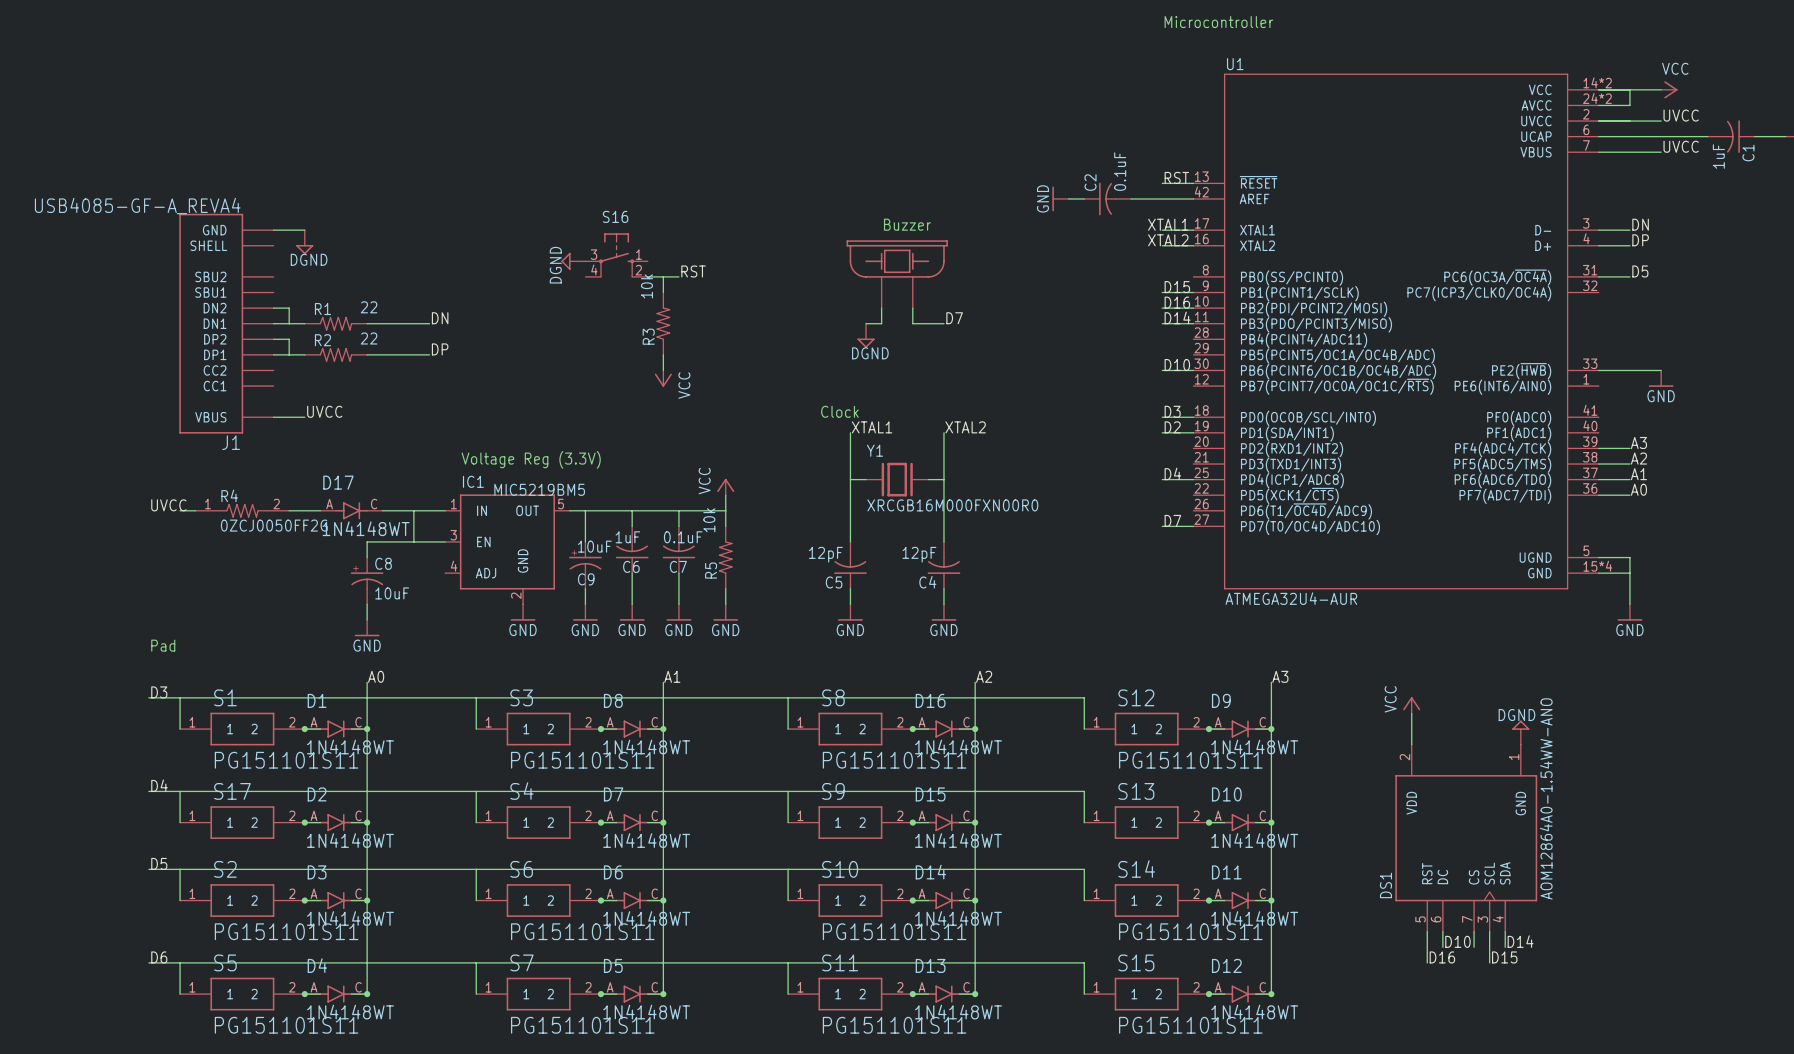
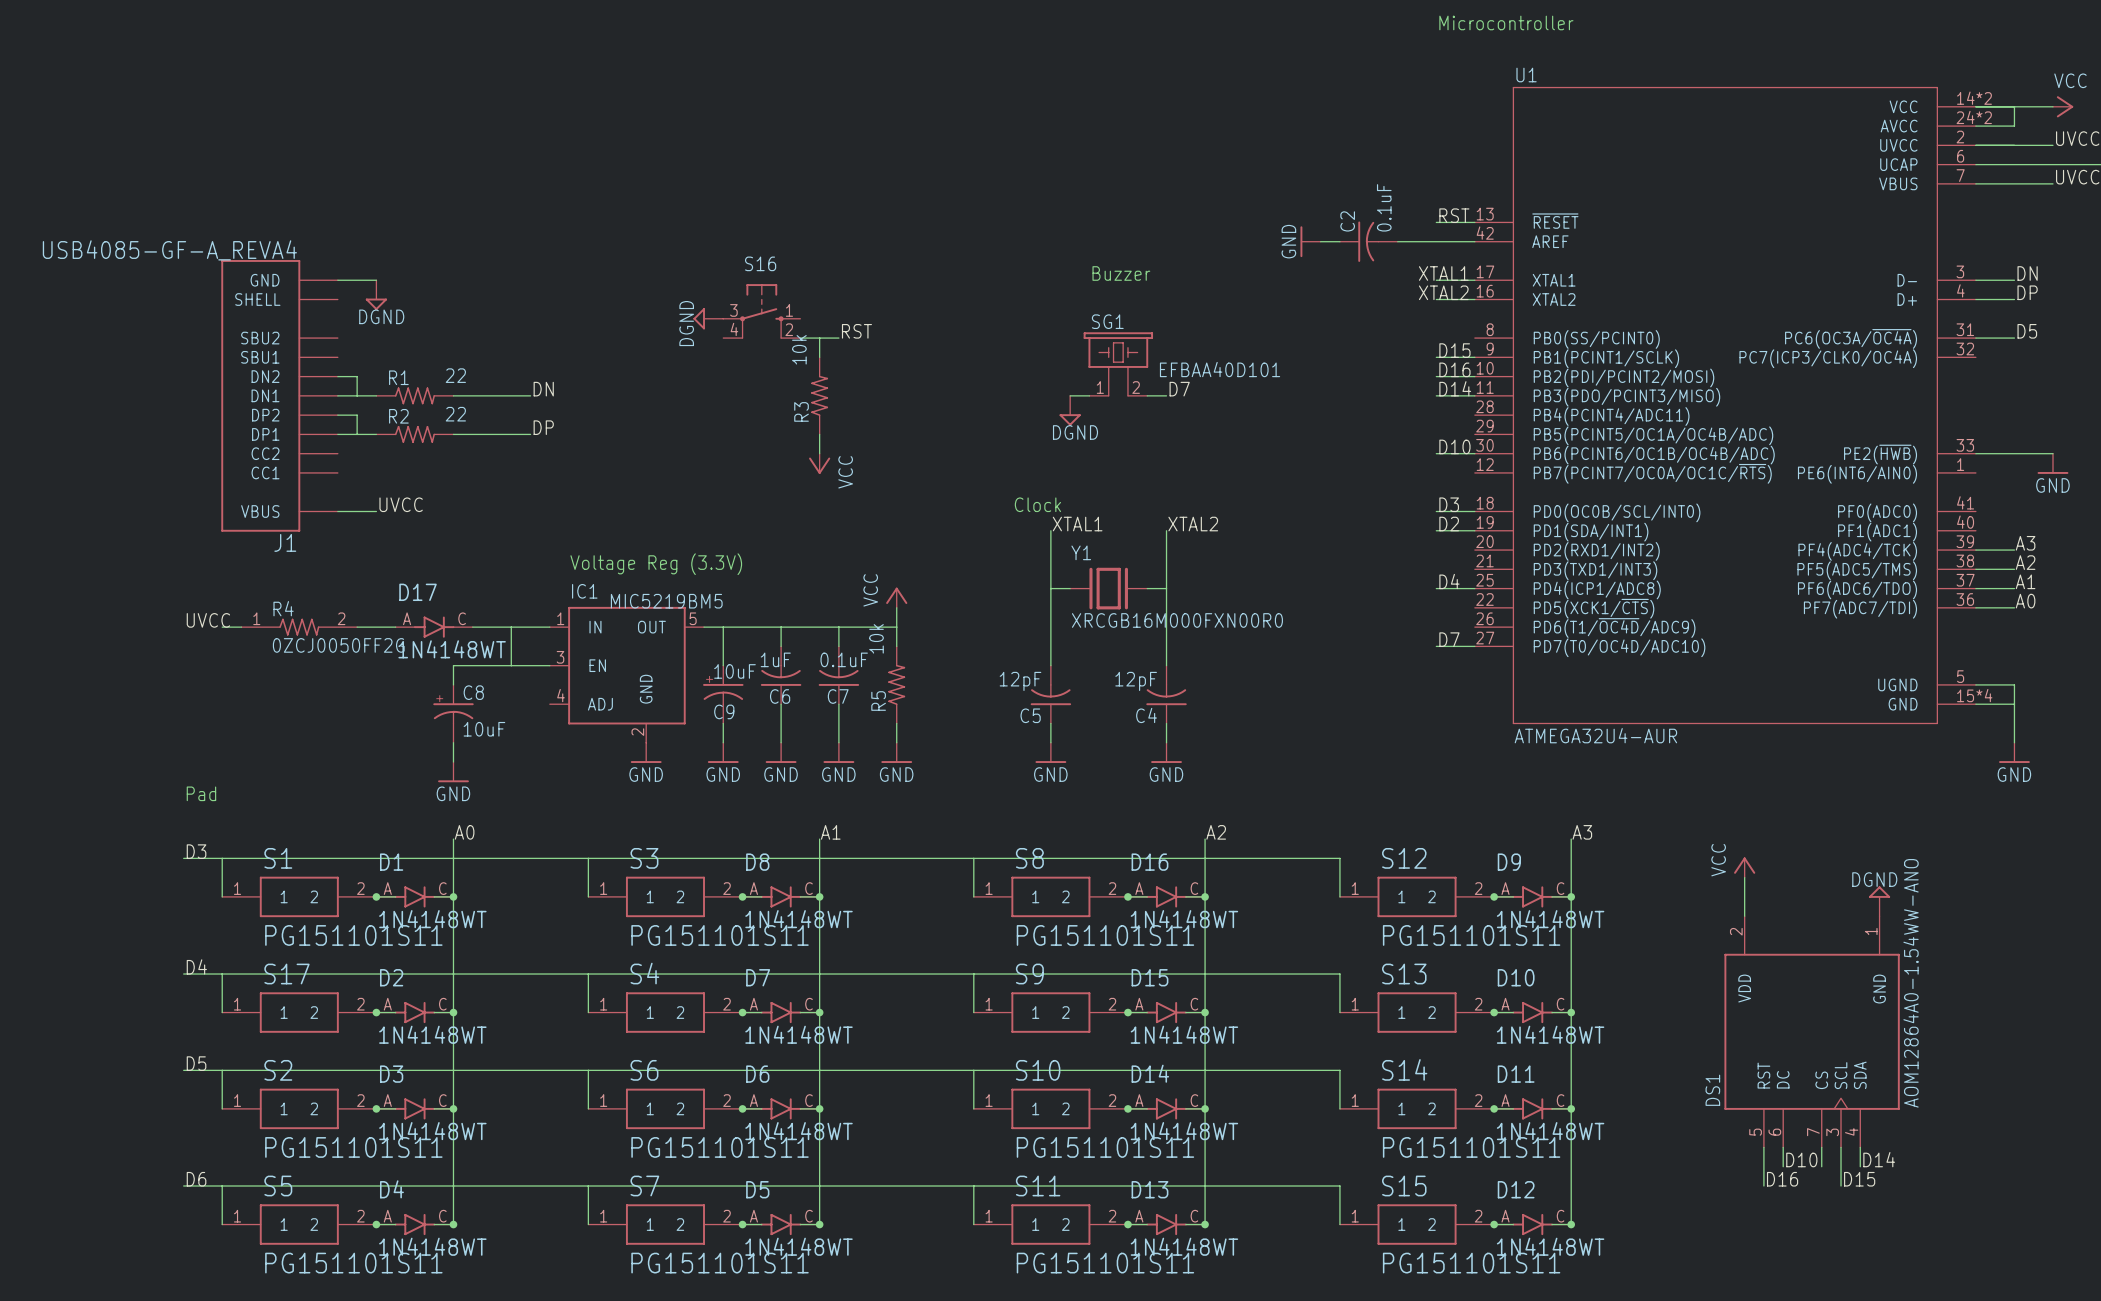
part: (897, 274) -> none
SG1: none -> EFBAA40D101 (1118, 364)
wire: (881, 308) (881, 323) -> none

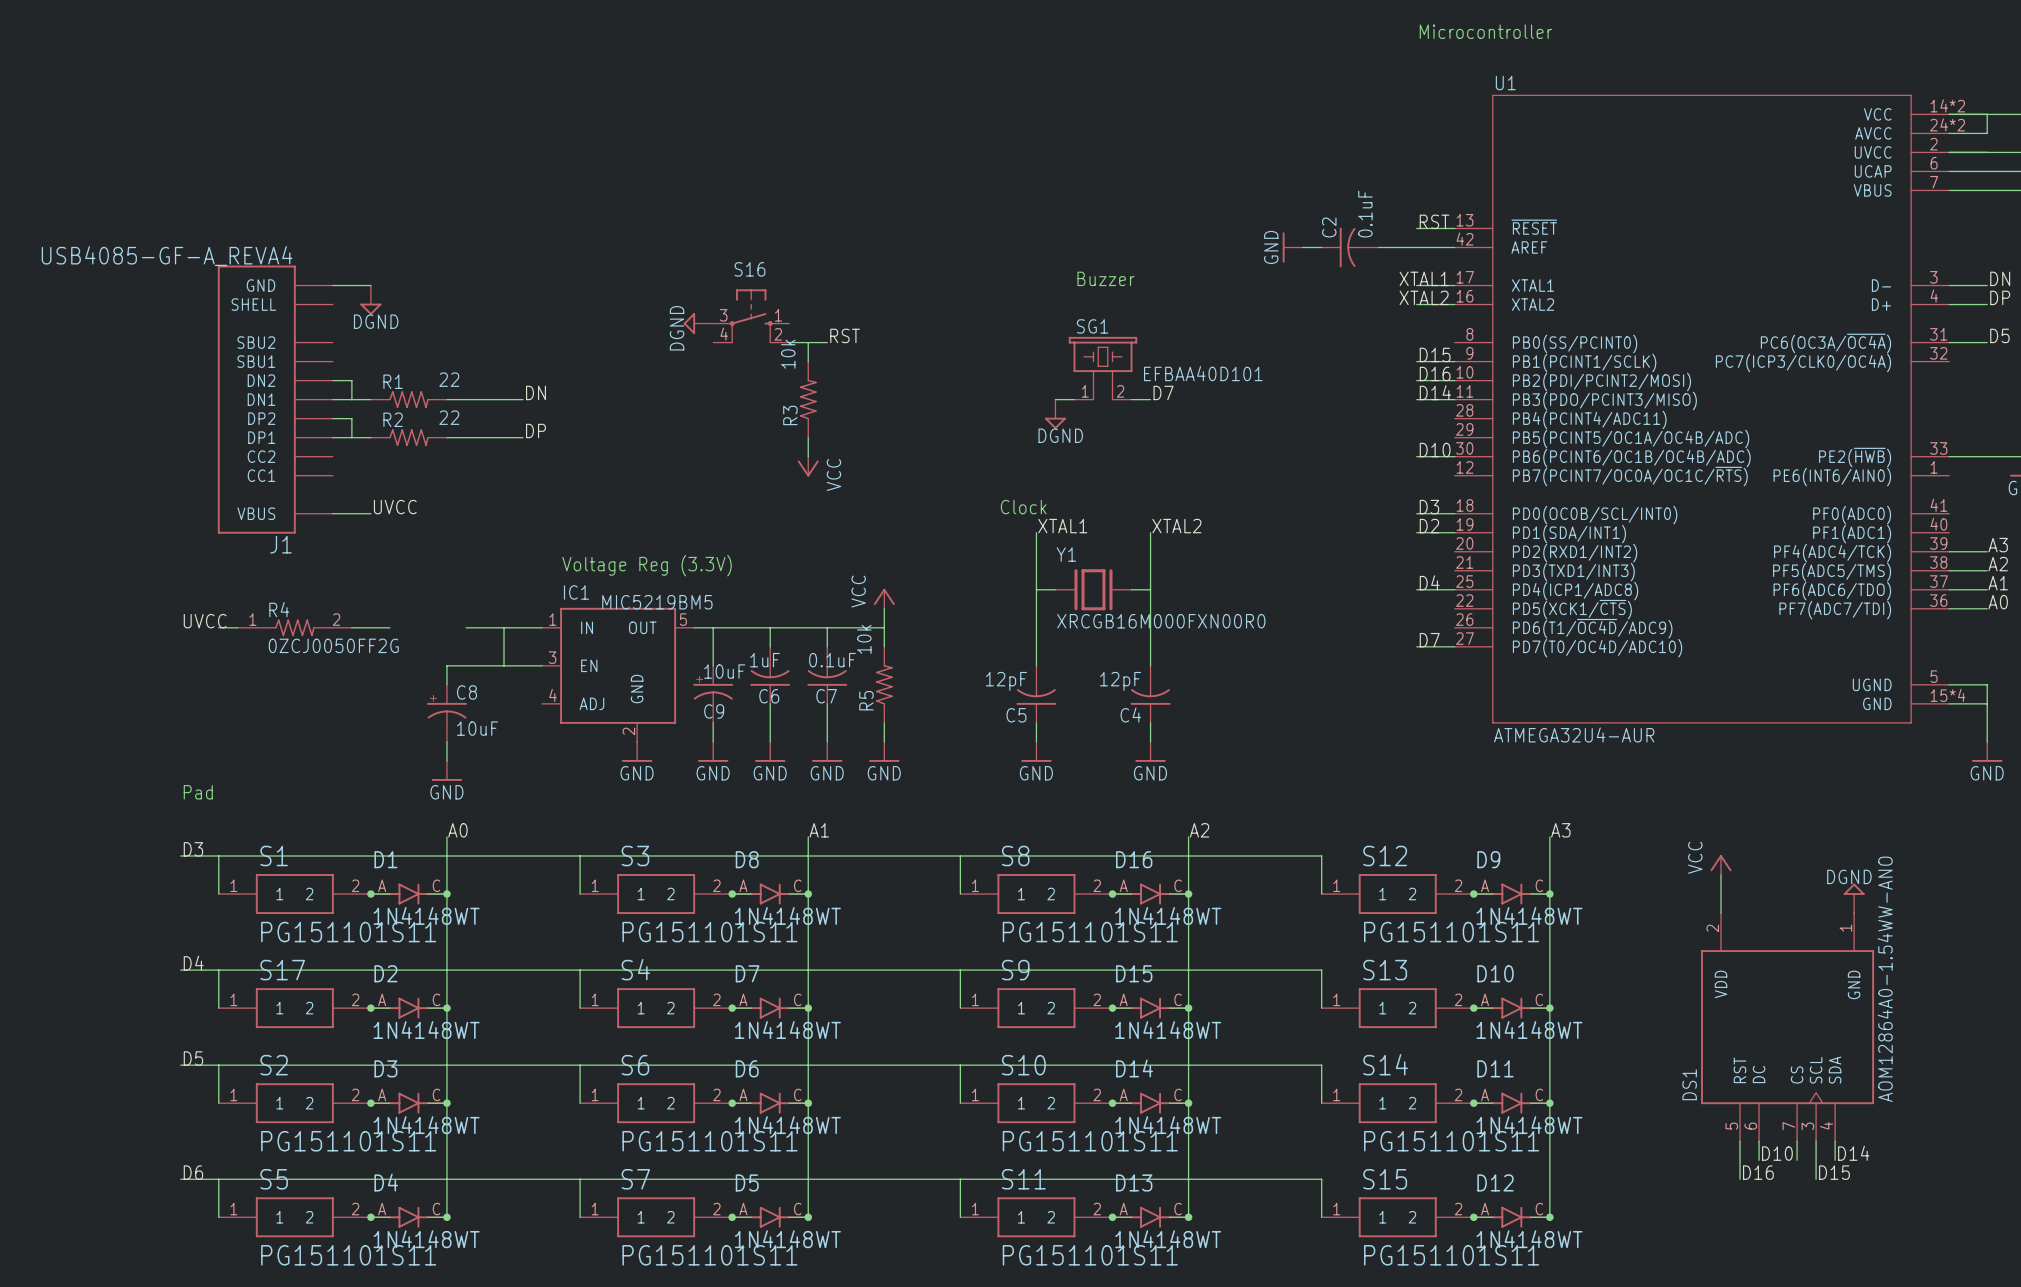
D17: 1N4148WT (434, 627) -> none

